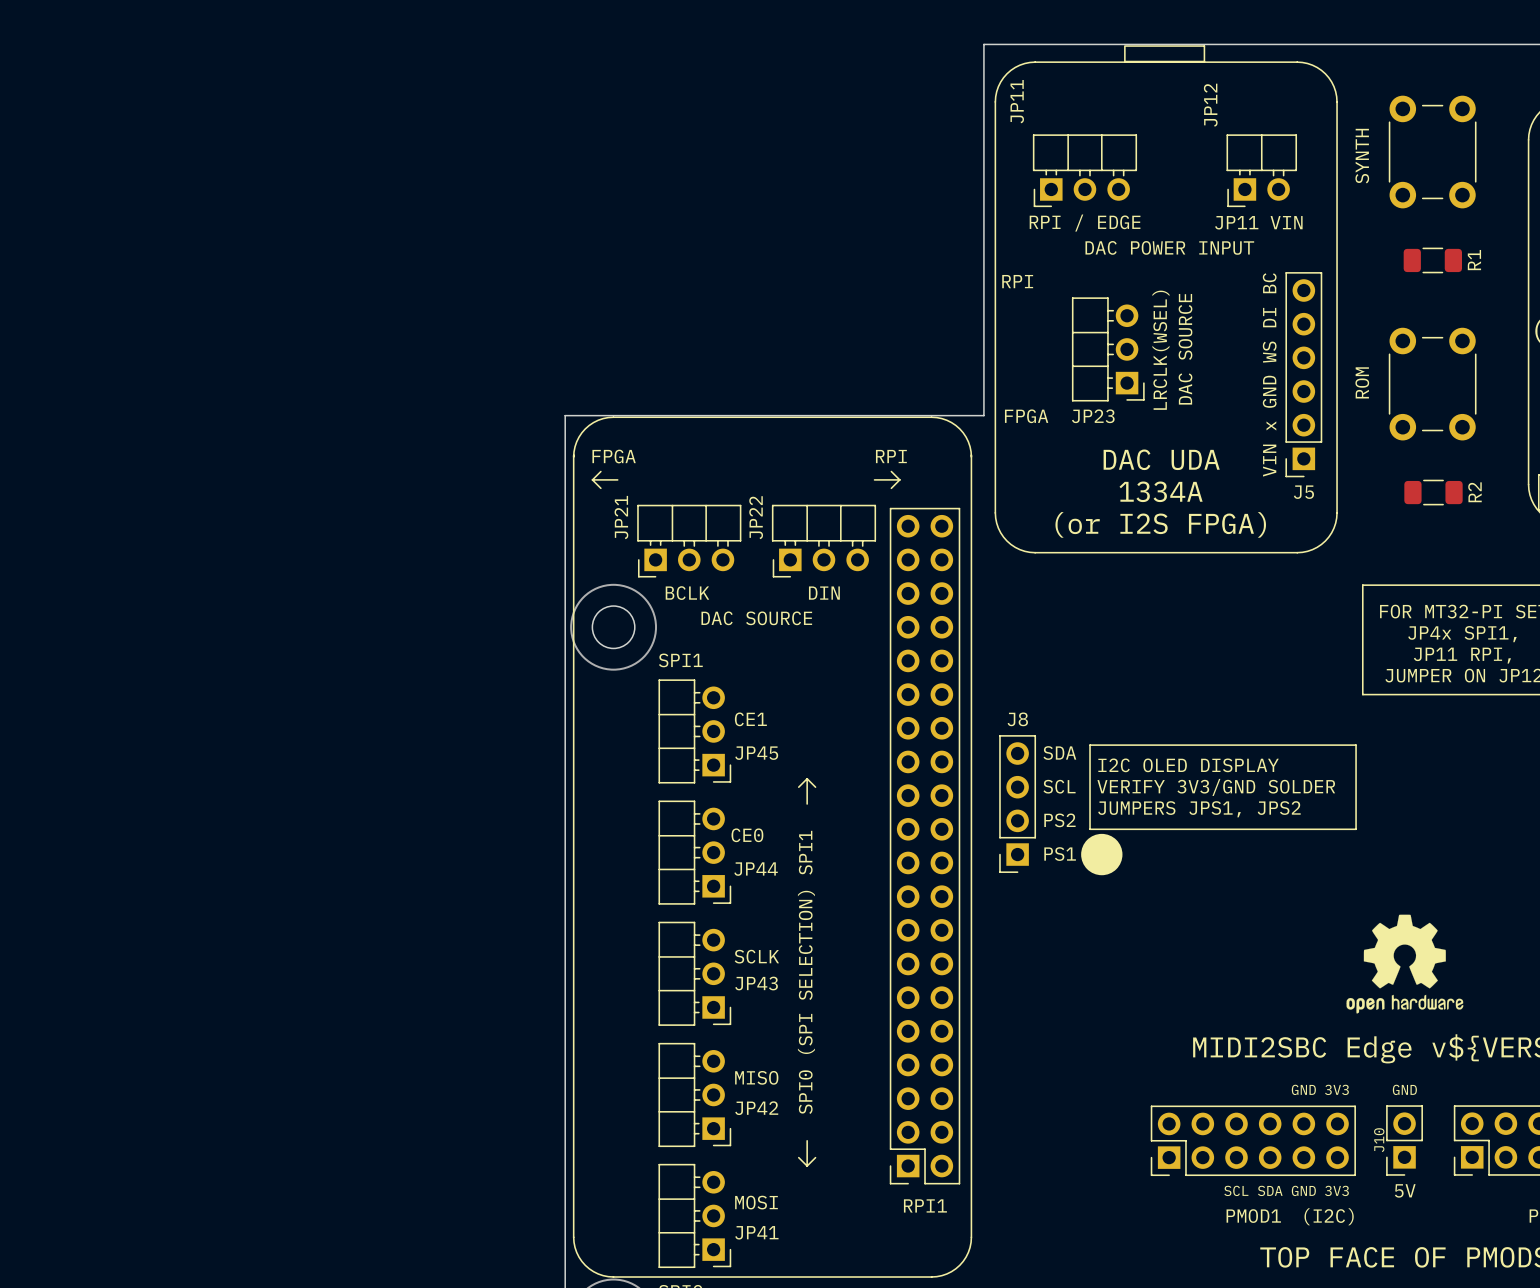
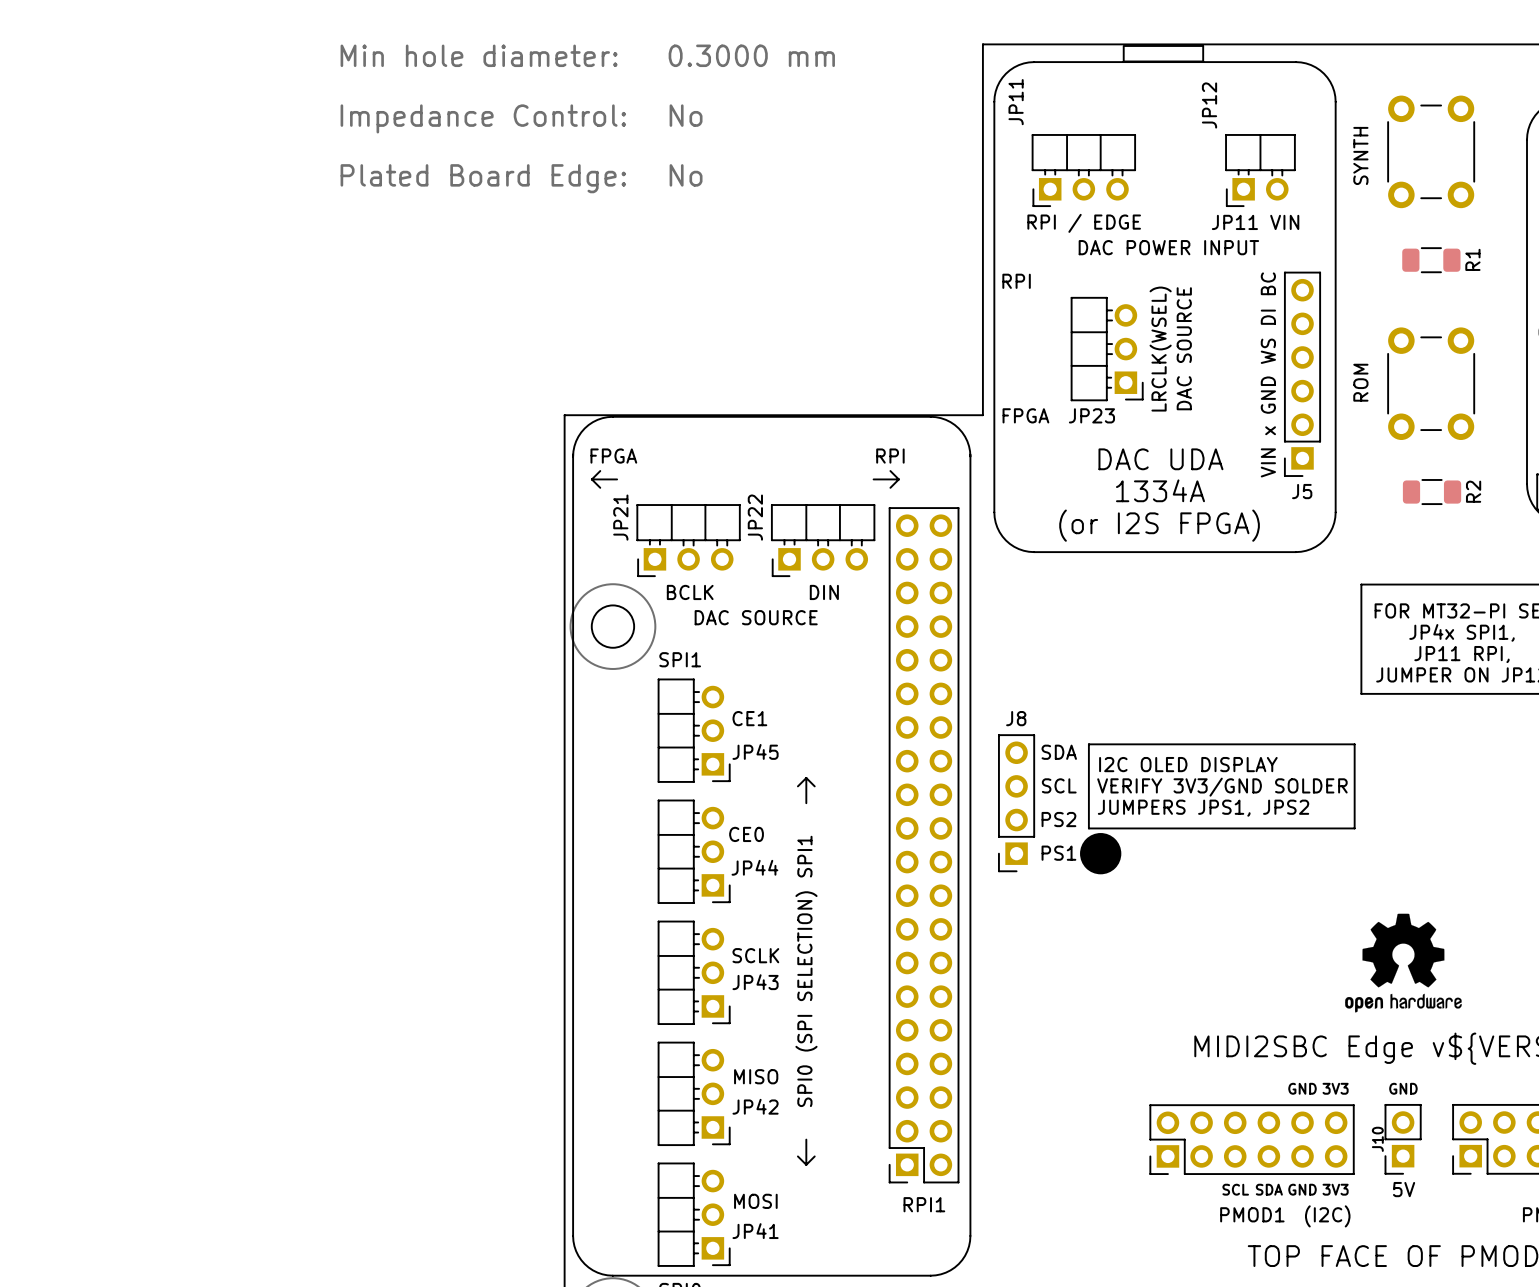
text: none -> Min hole diameter: (479, 55)
text: none -> 0.3000 mm (751, 55)
text: none -> No (686, 115)
text: none -> Impedance Control: (483, 118)
text: none -> No (686, 175)
text: none -> Plated Board Edge: (483, 178)

